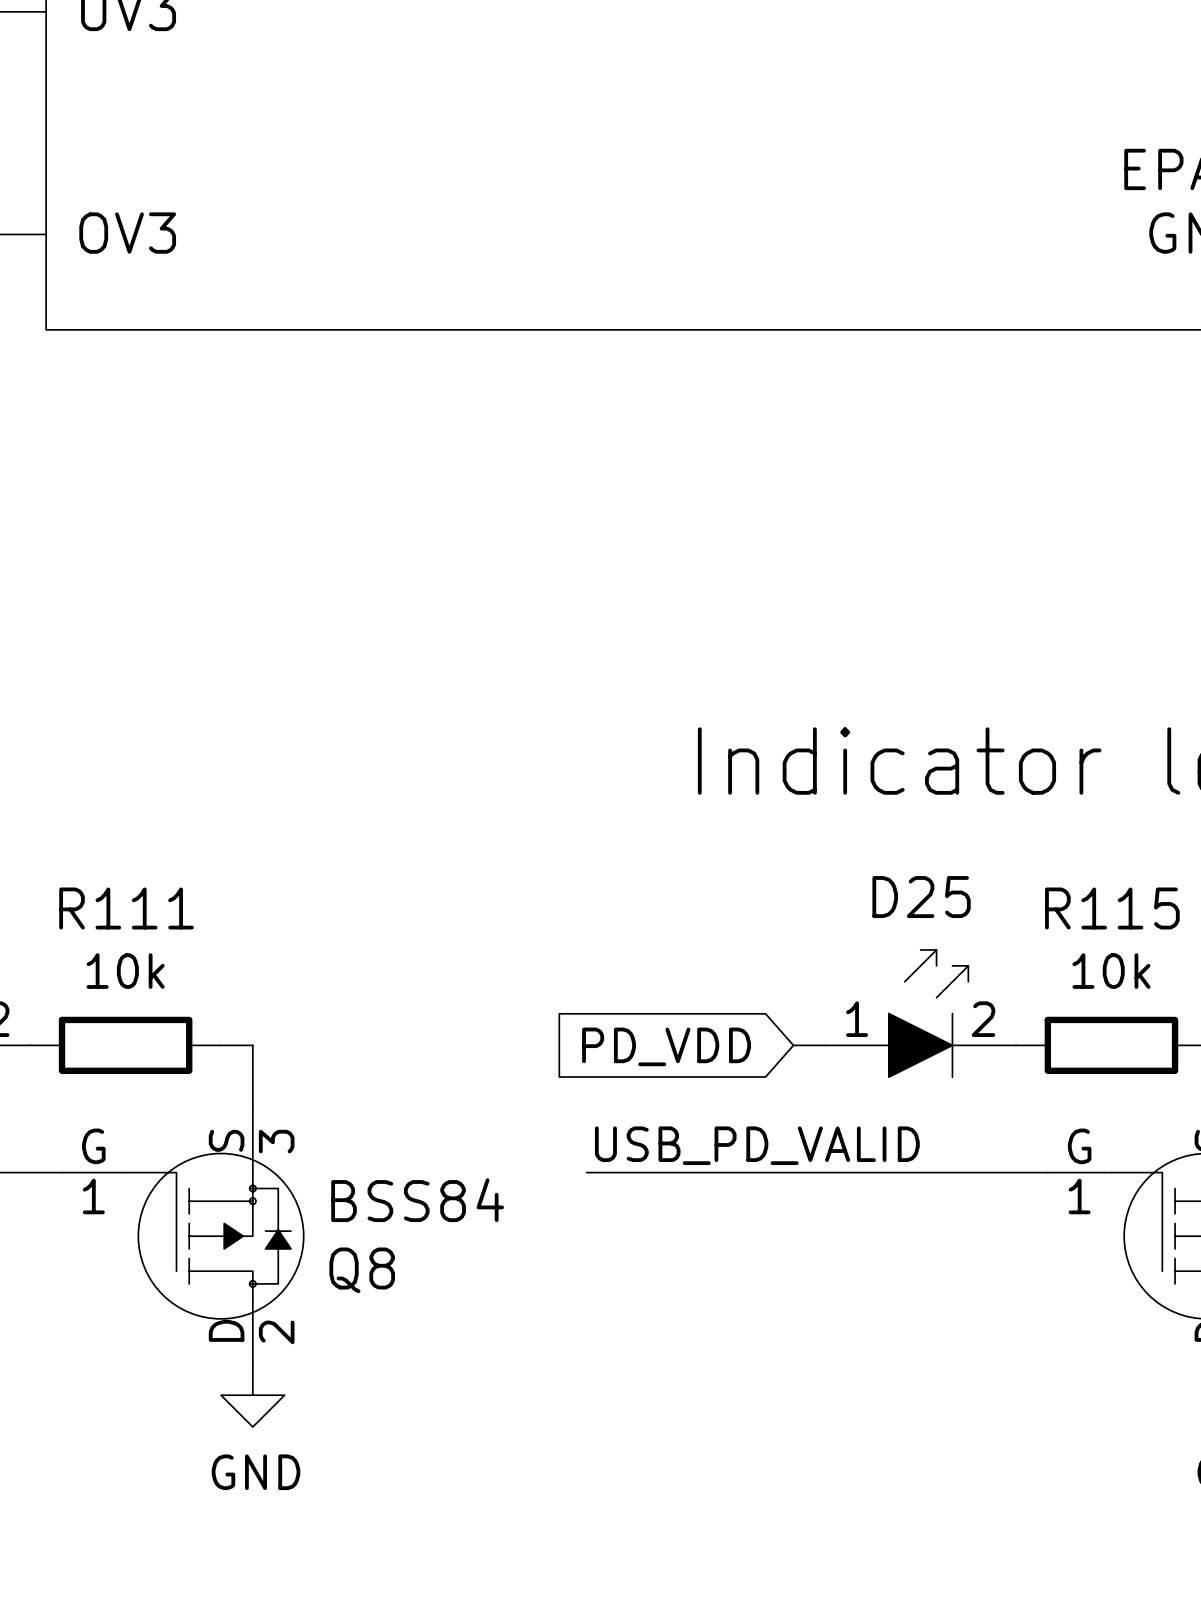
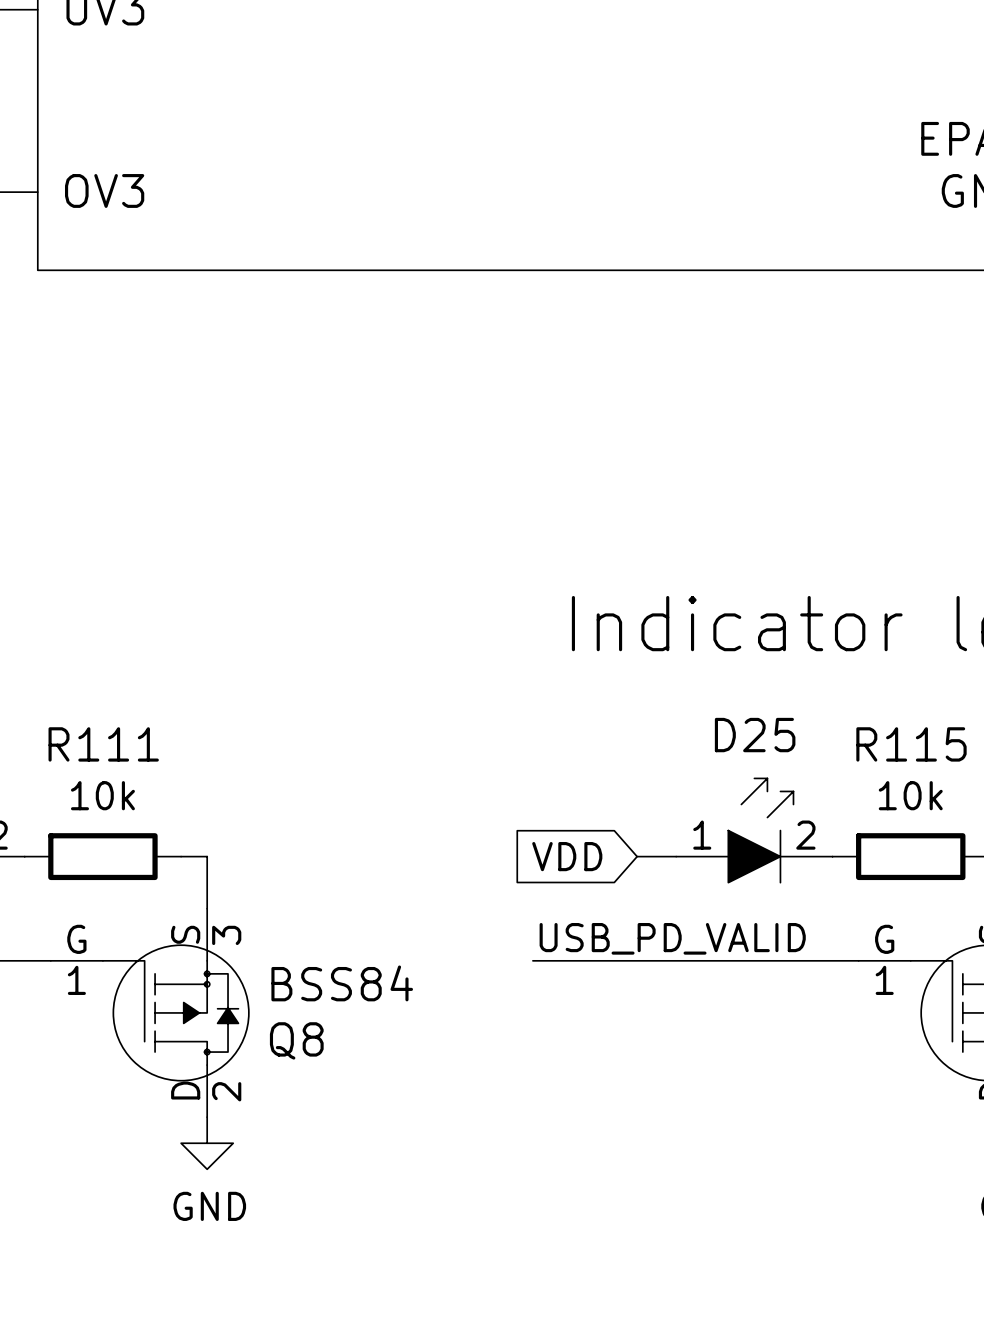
wire: none -> (637, 856) (650, 856)
global label: PD_VDD (666, 1046) -> VDD (567, 856)
label position: USB_PD_VALID (757, 1145) -> USB_PD_VALID (672, 938)
wire: (586, 1172) (650, 1172) -> none

